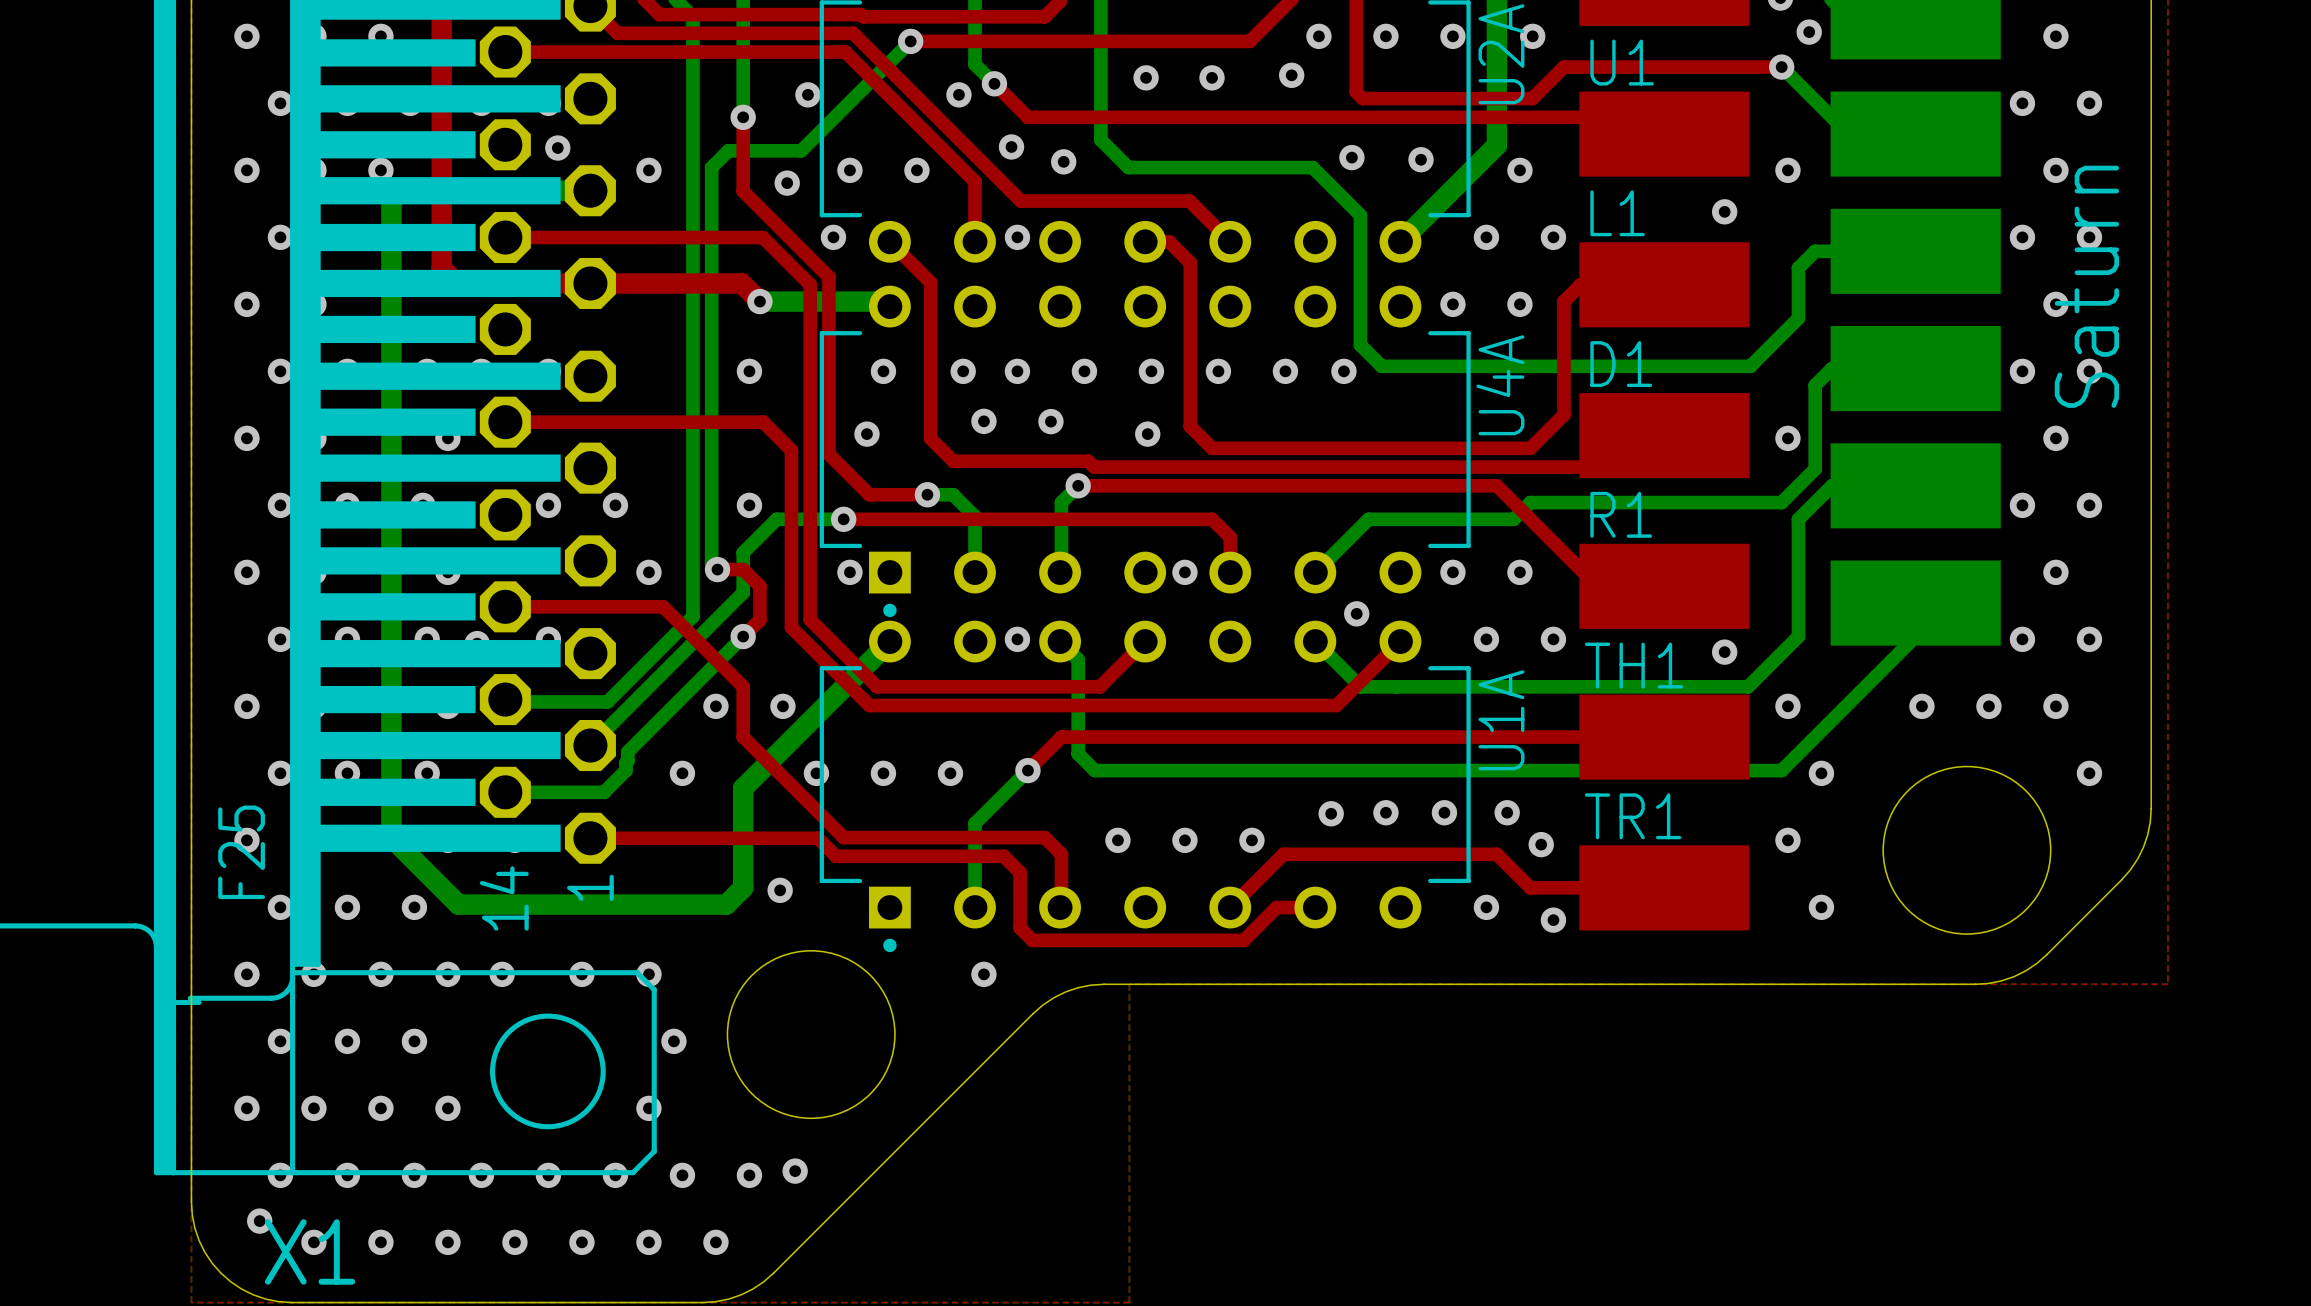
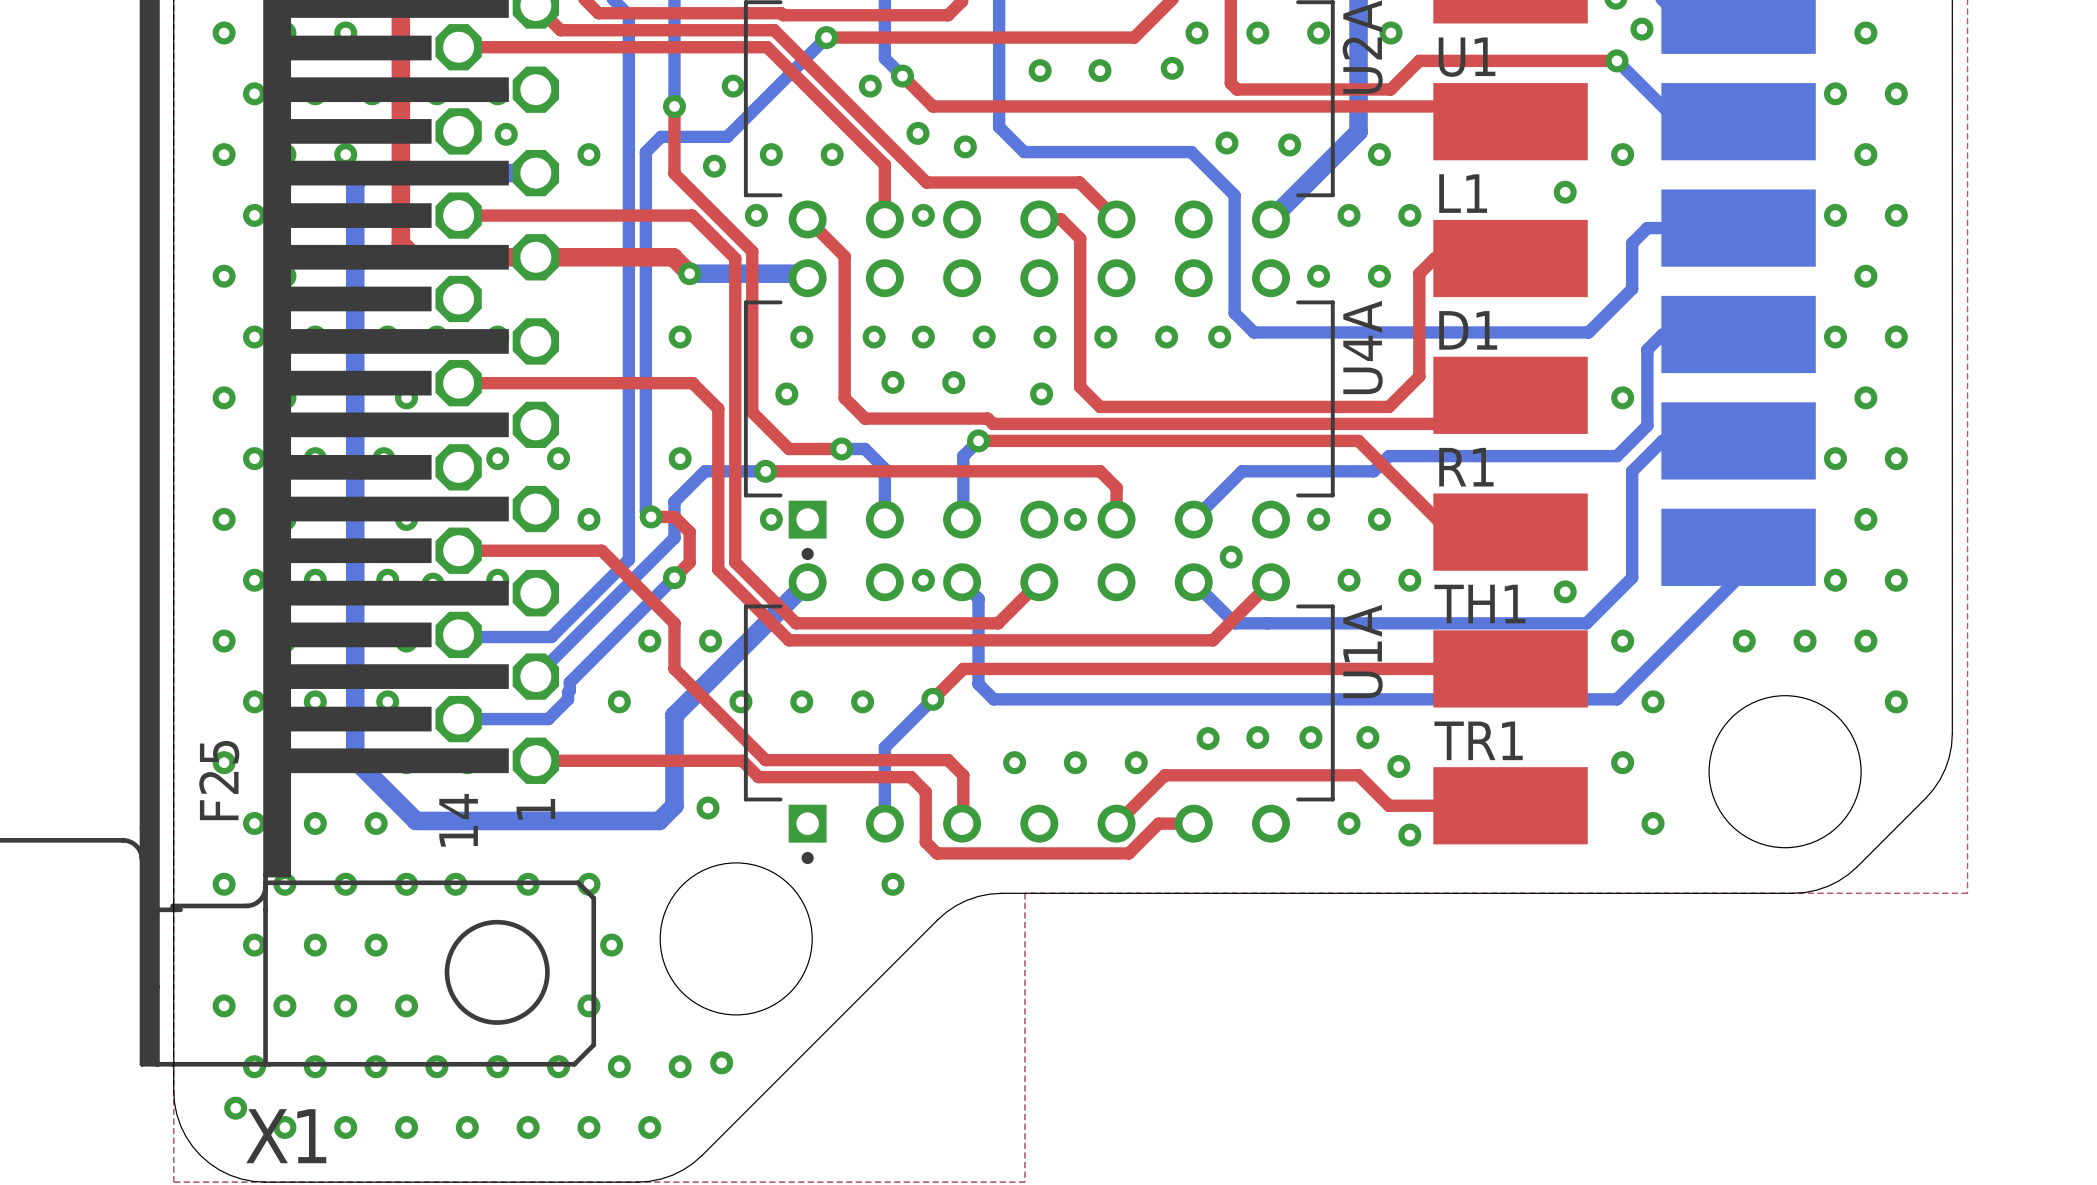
text: Saturn (2086, 286) -> none

